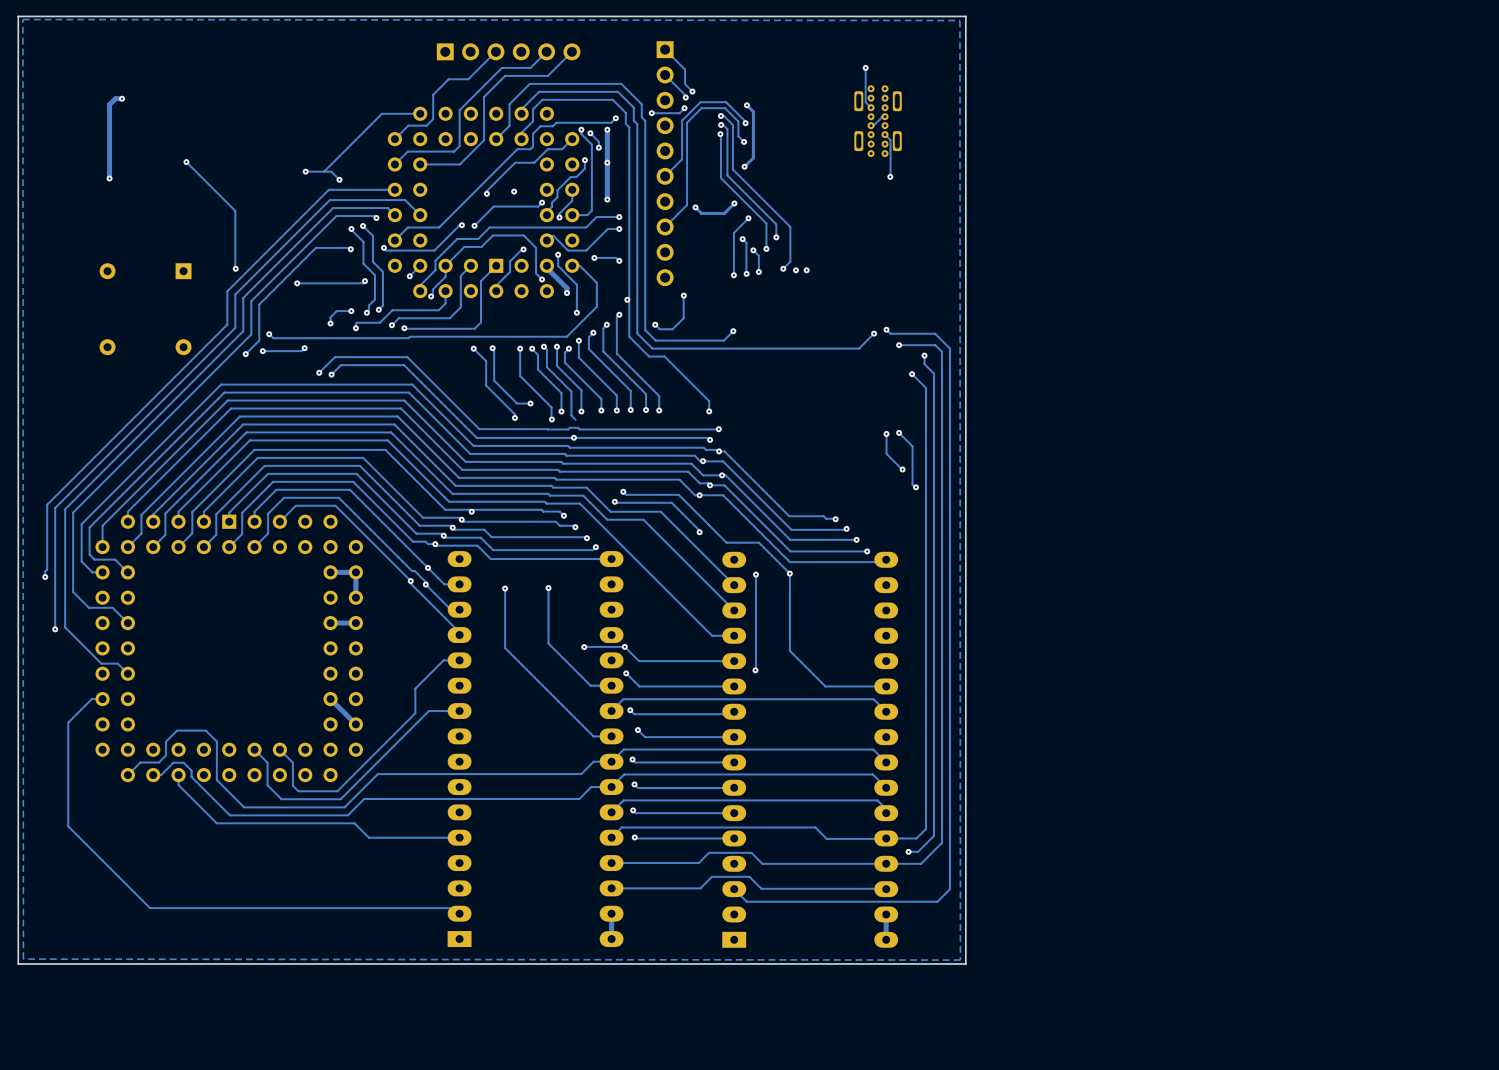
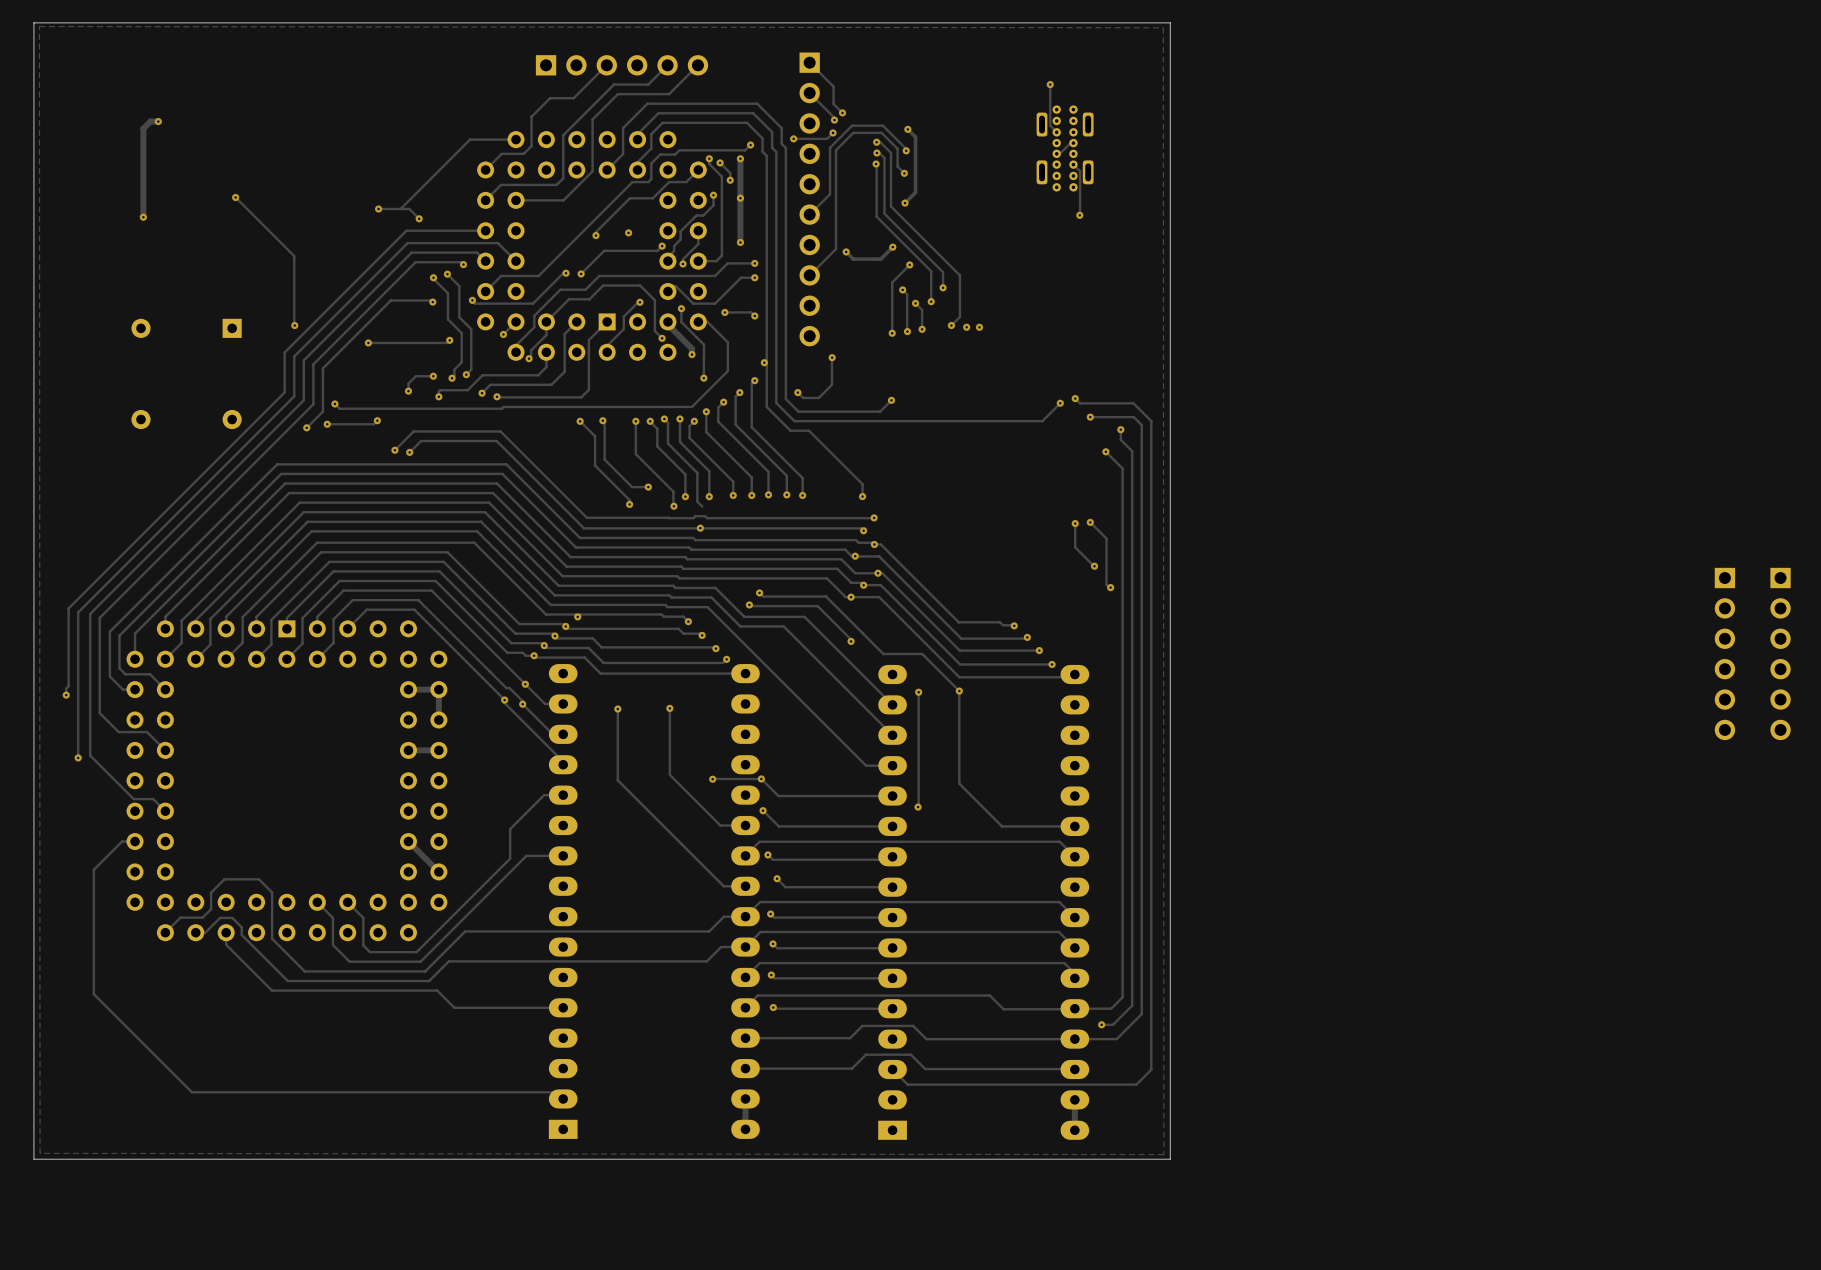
part: none -> (1724, 653)
part: none -> (1780, 653)

